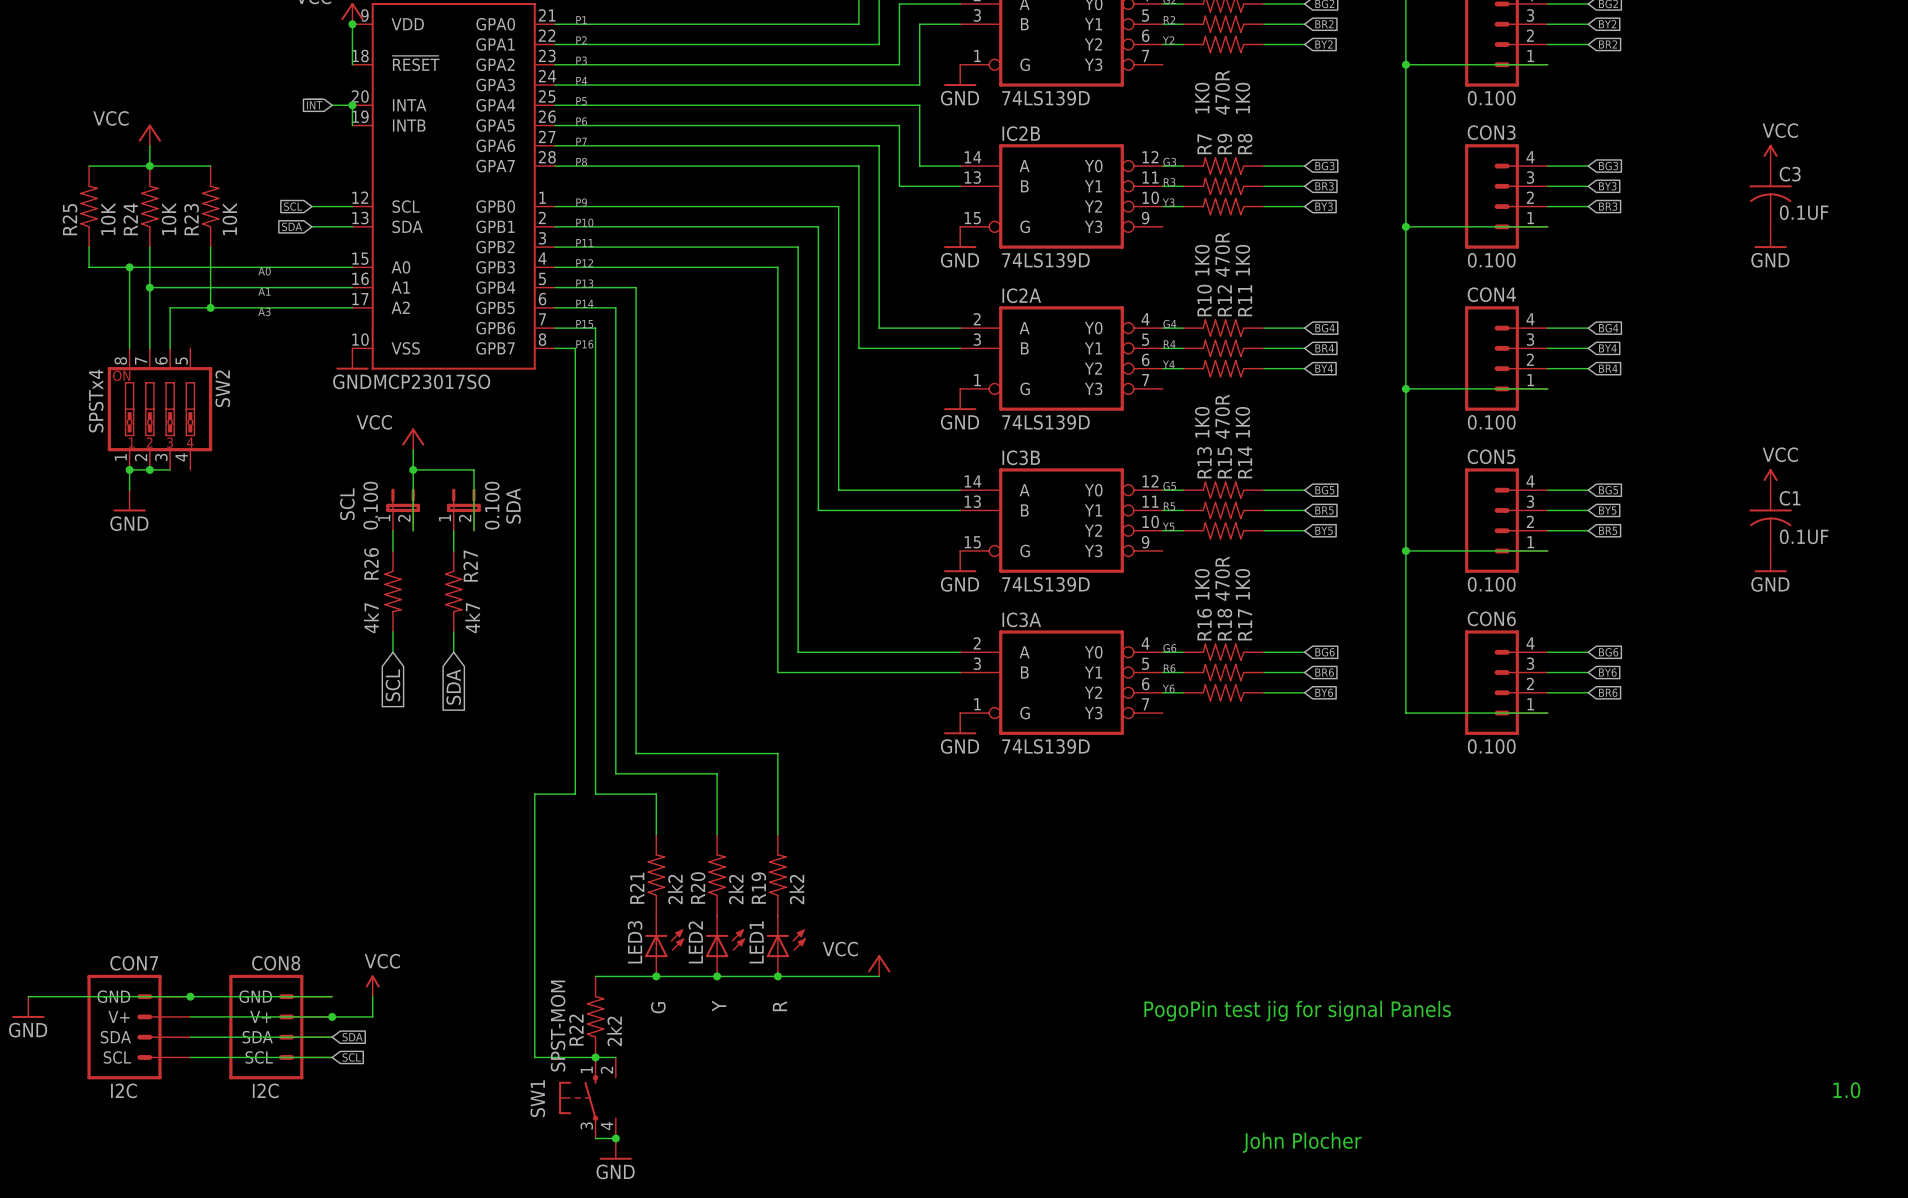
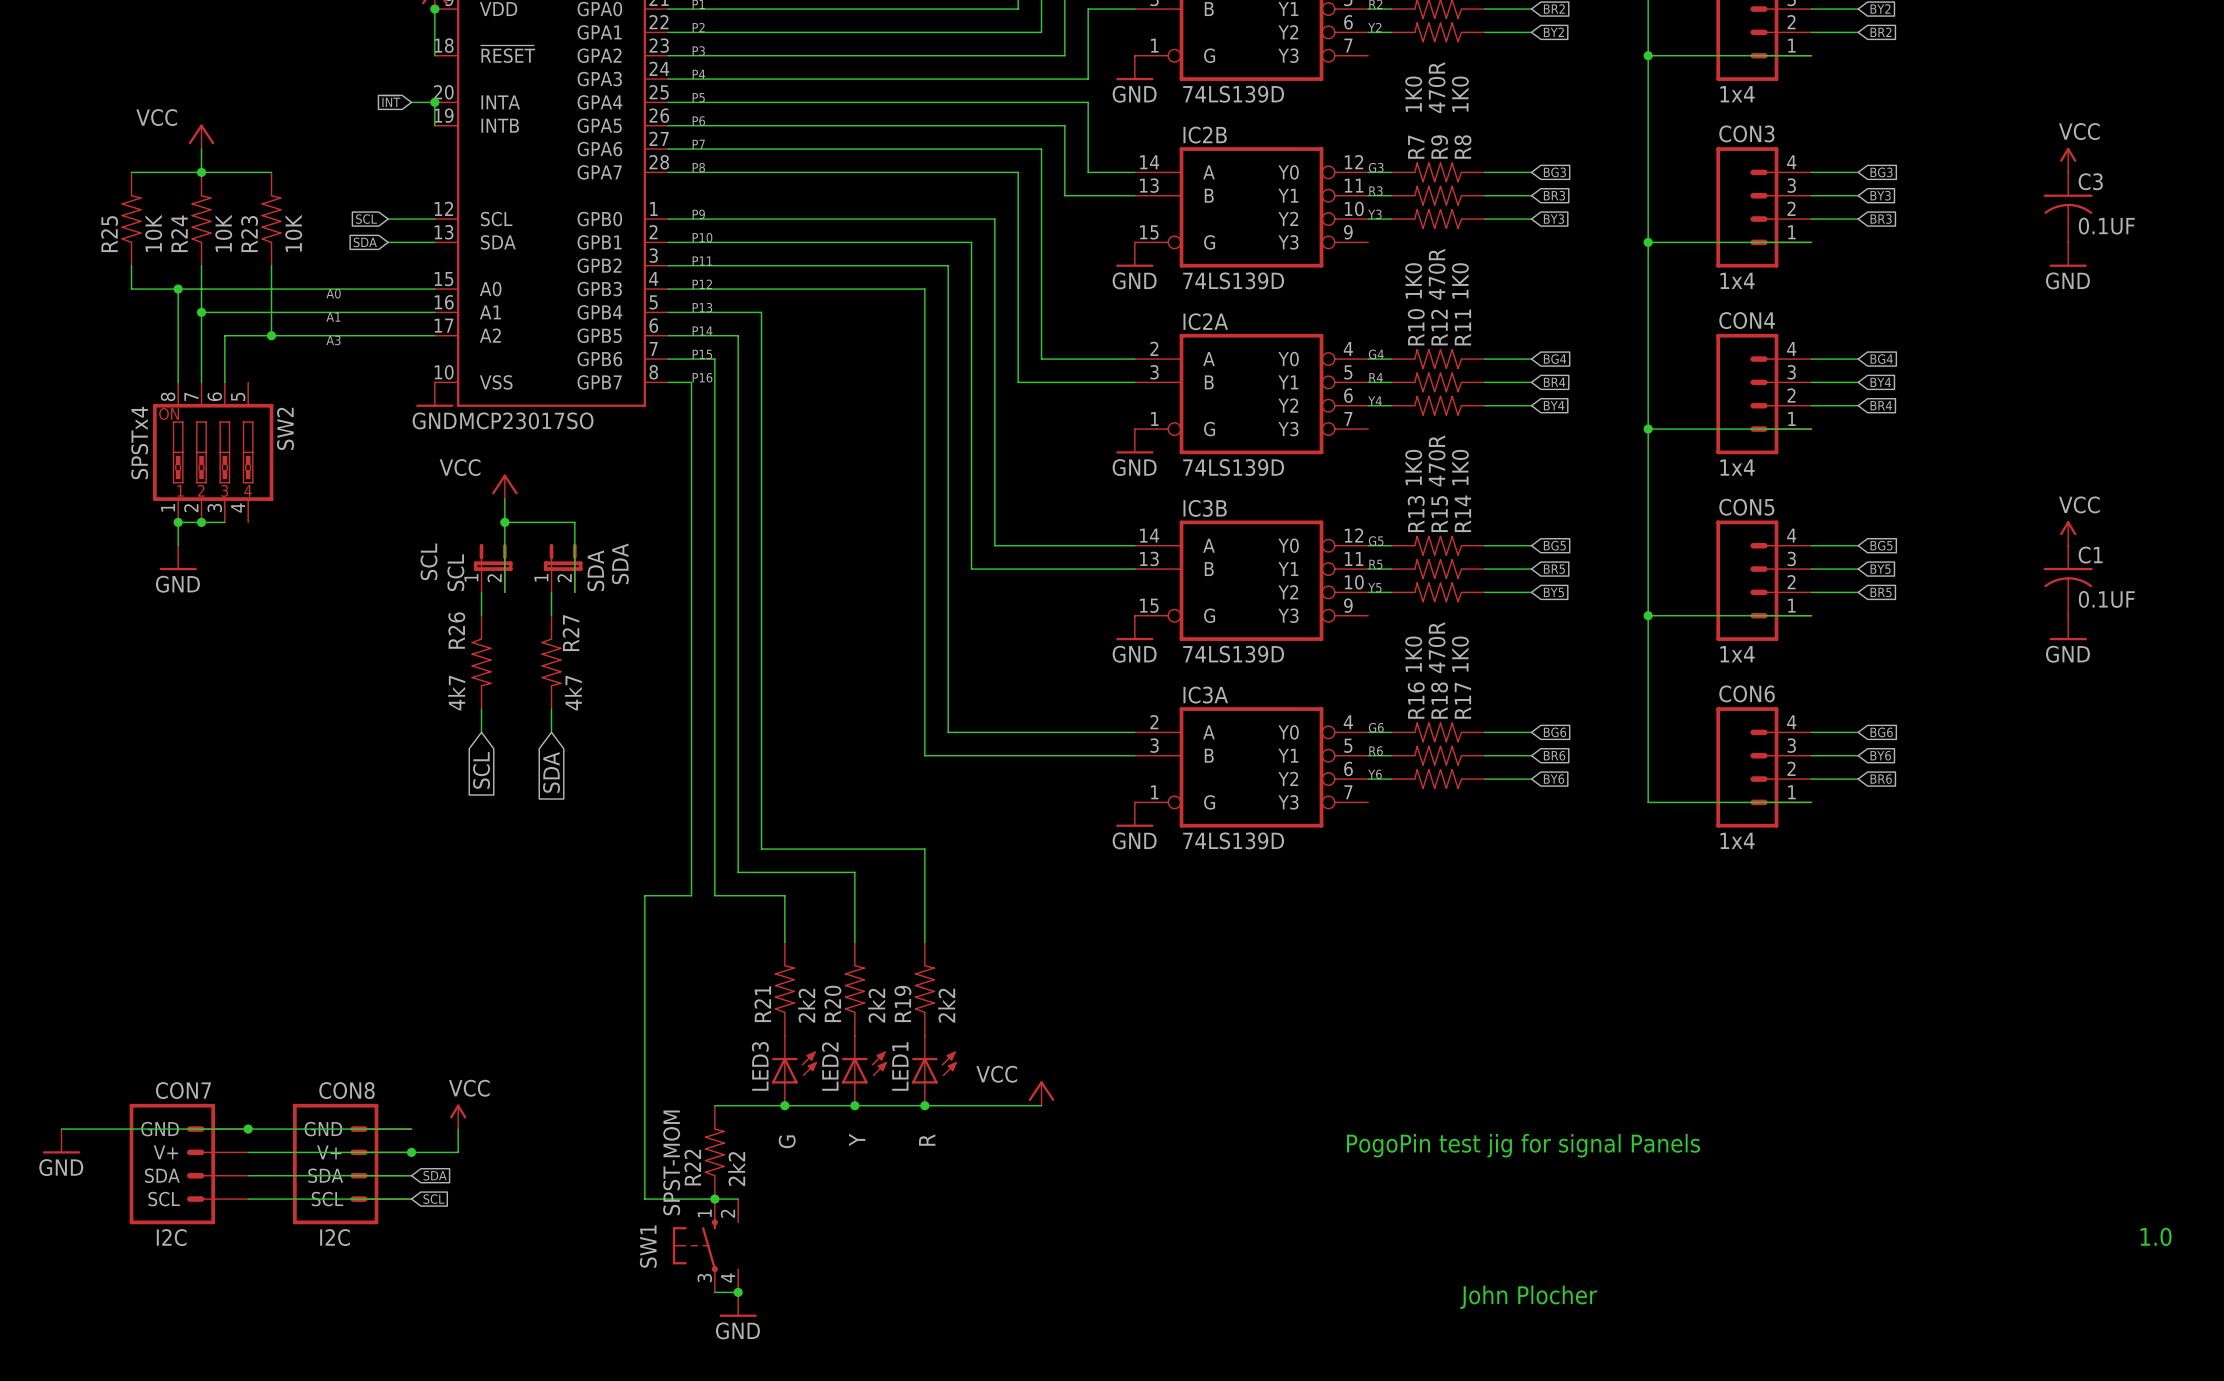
part value: 0.100 (1491, 98) -> 1x4 (1737, 94)
CON3 value: 0.100 (1491, 260) -> 1x4 (1737, 280)
CON4 value: 0.100 (1491, 422) -> 1x4 (1737, 467)
SCL value: 0.100 (370, 505) -> SCL (455, 572)
SDA value: 0.100 (492, 505) -> SDA (595, 570)
CON5 value: 0.100 (1491, 584) -> 1x4 (1737, 654)
CON6 value: 0.100 (1491, 746) -> 1x4 (1737, 840)

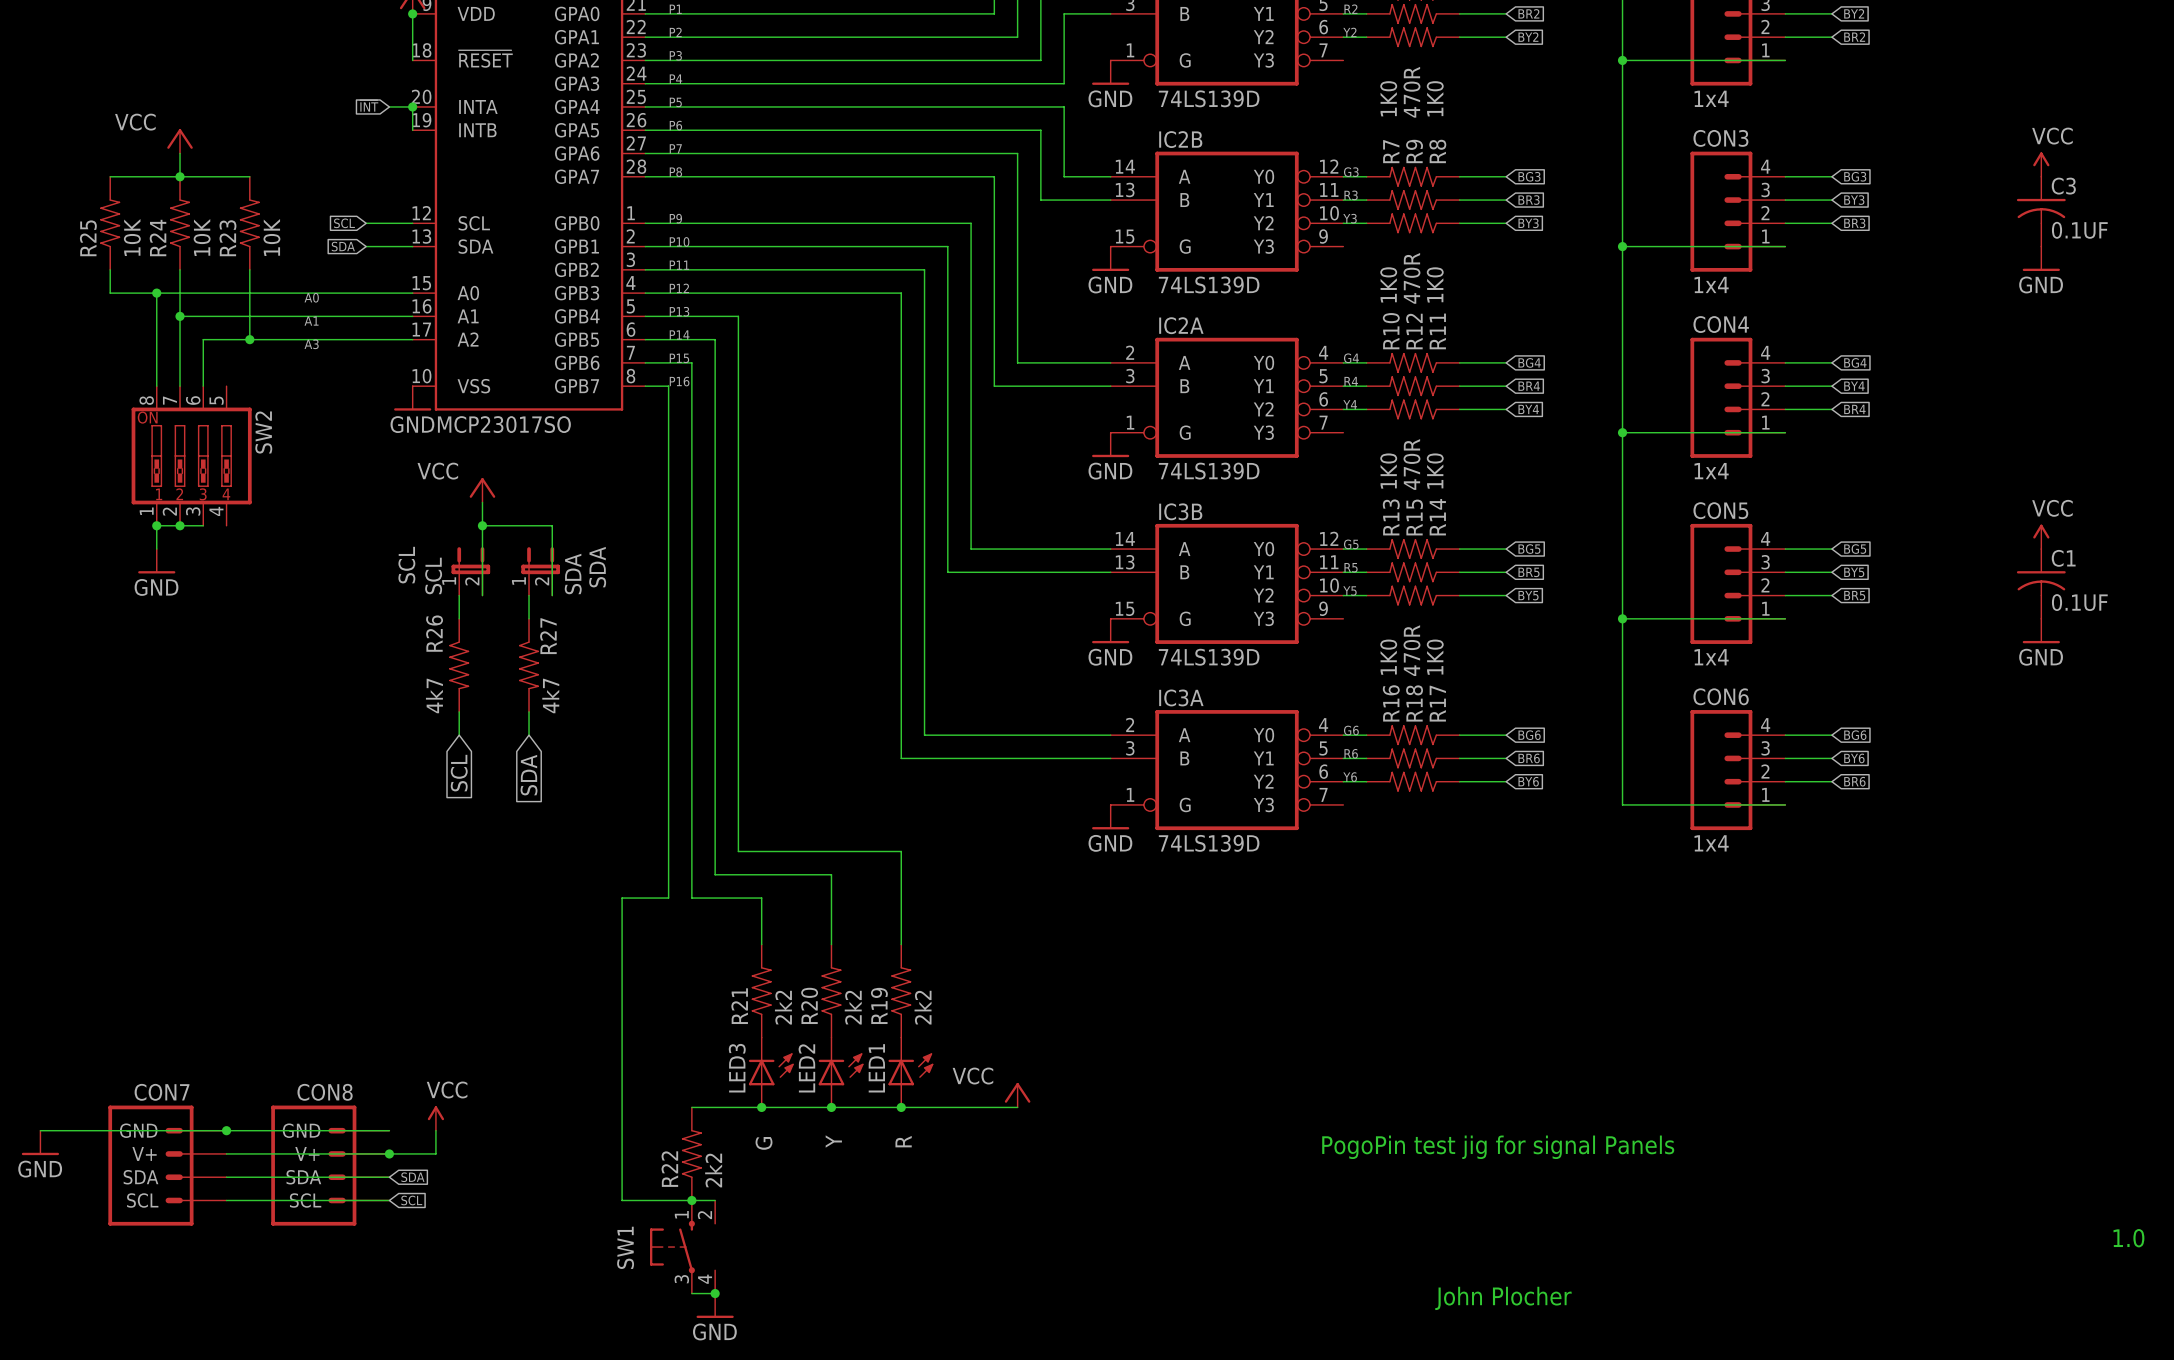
SW2 value: SPSTx4 (139, 443) -> none
SW1 value: SPST-MOM (671, 1162) -> none
CON7 value: I2C (171, 1237) -> none
CON8 value: I2C (335, 1237) -> none

